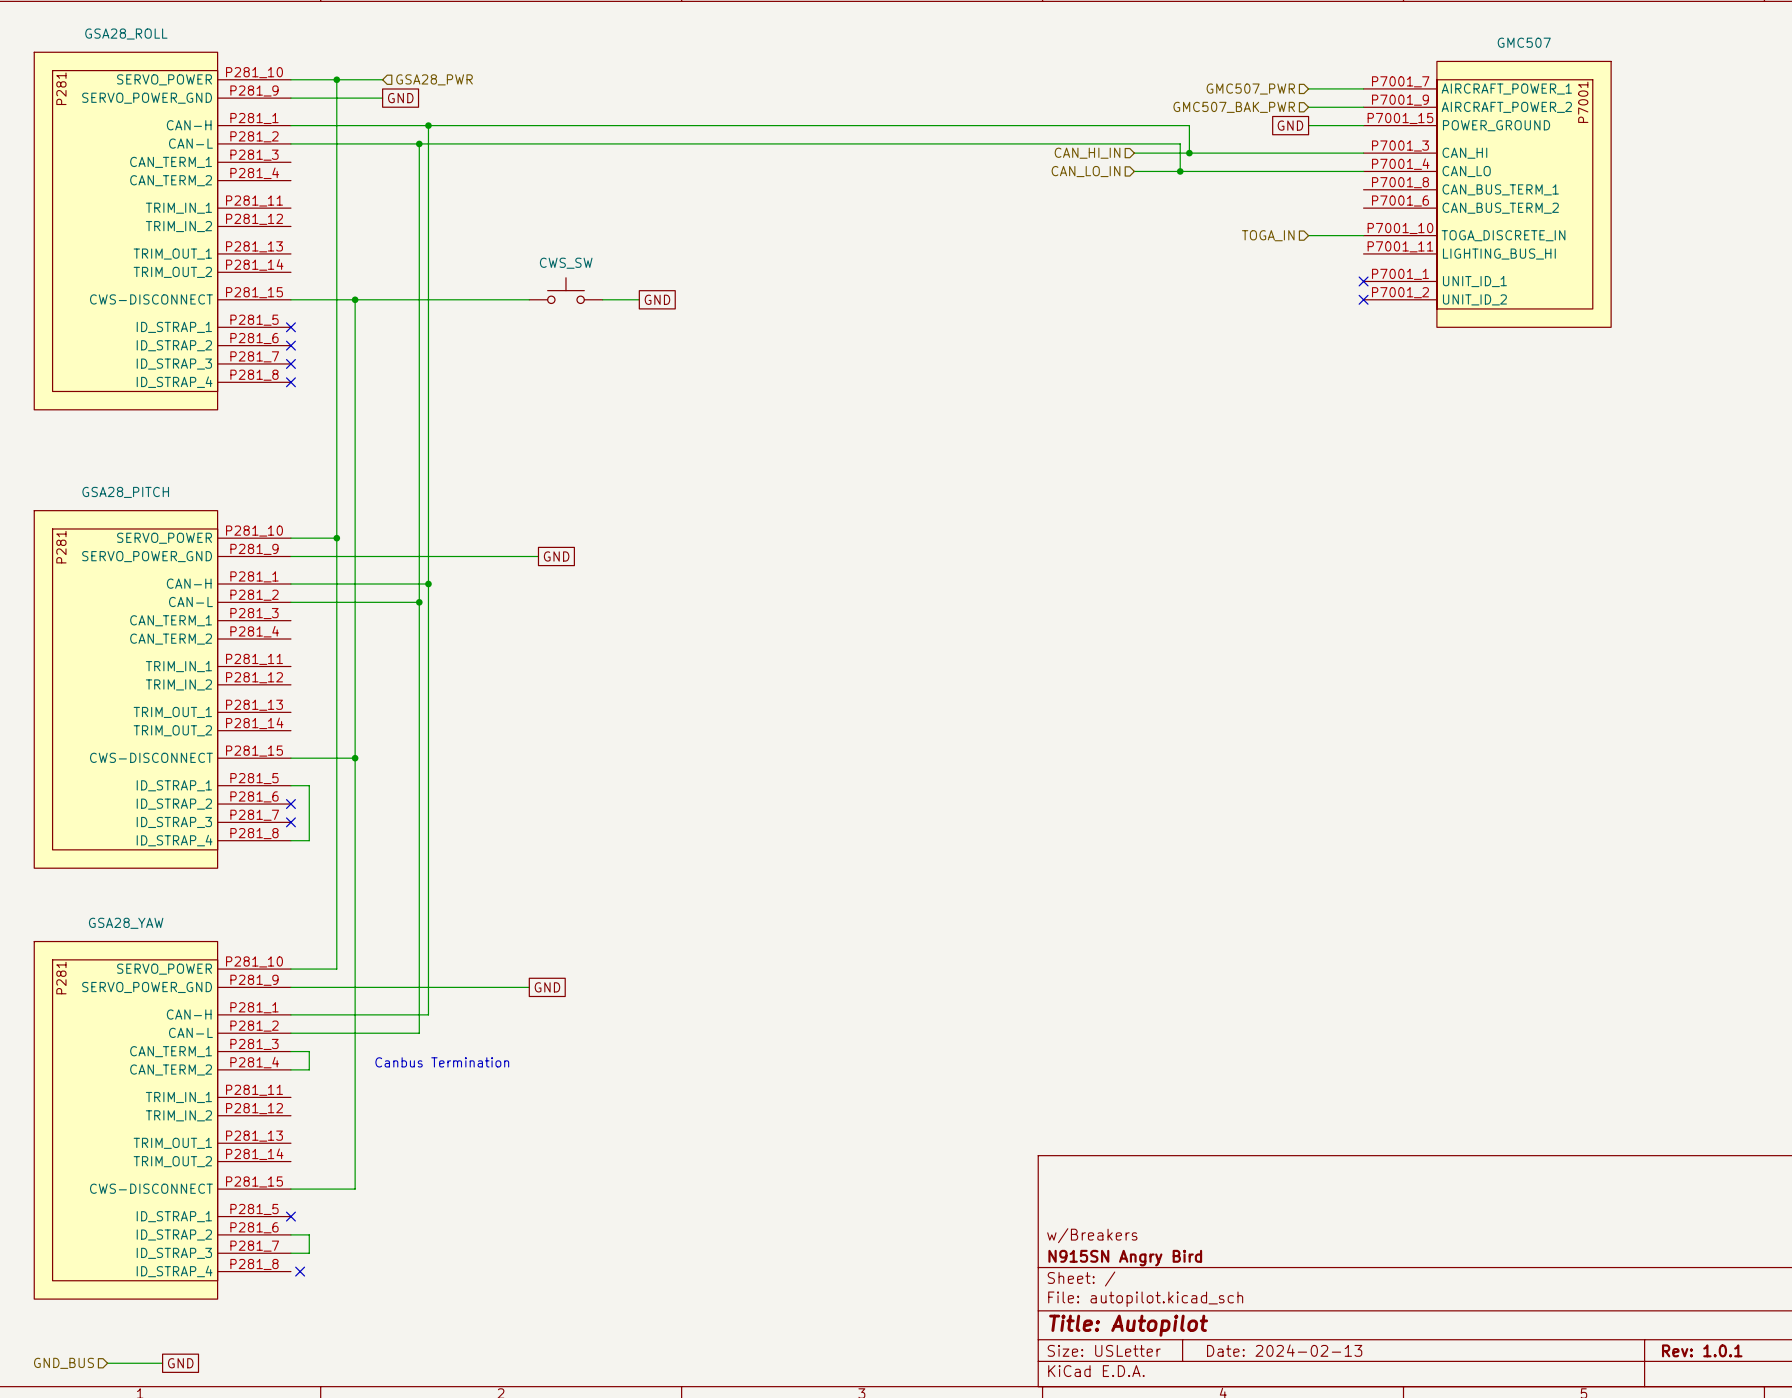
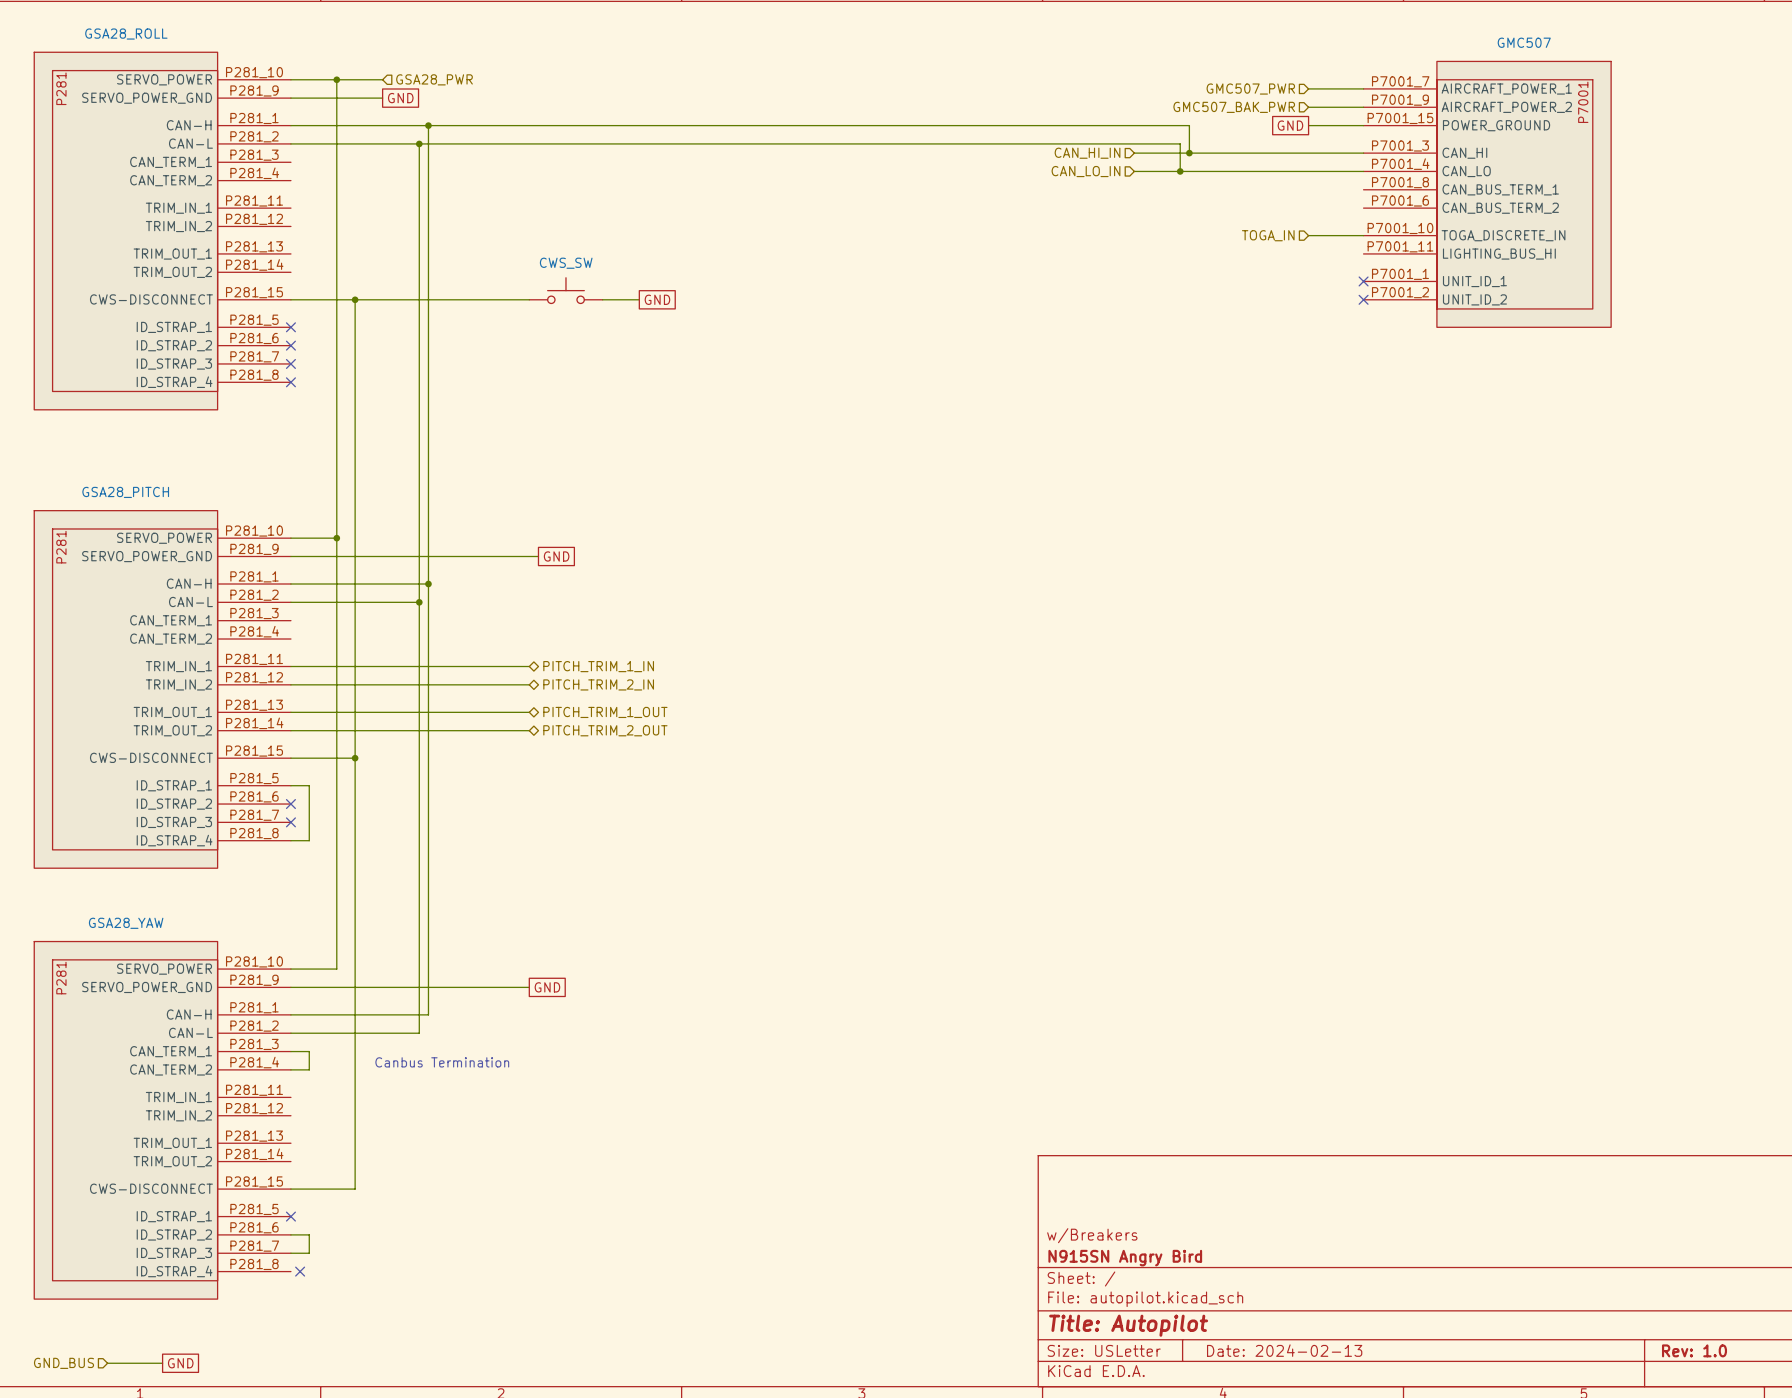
wire: none -> (290, 666) (529, 666)
hierarchical label: none -> PITCH_TRIM_1_IN (598, 666)
wire: none -> (290, 684) (529, 684)
hierarchical label: none -> PITCH_TRIM_2_IN (598, 684)
wire: none -> (290, 712) (529, 712)
hierarchical label: none -> PITCH_TRIM_1_OUT (605, 712)
wire: none -> (290, 730) (529, 730)
hierarchical label: none -> PITCH_TRIM_2_OUT (605, 730)
title block: Rev: 1.0.1 (1702, 1350) -> Rev: 1.0 (1694, 1350)

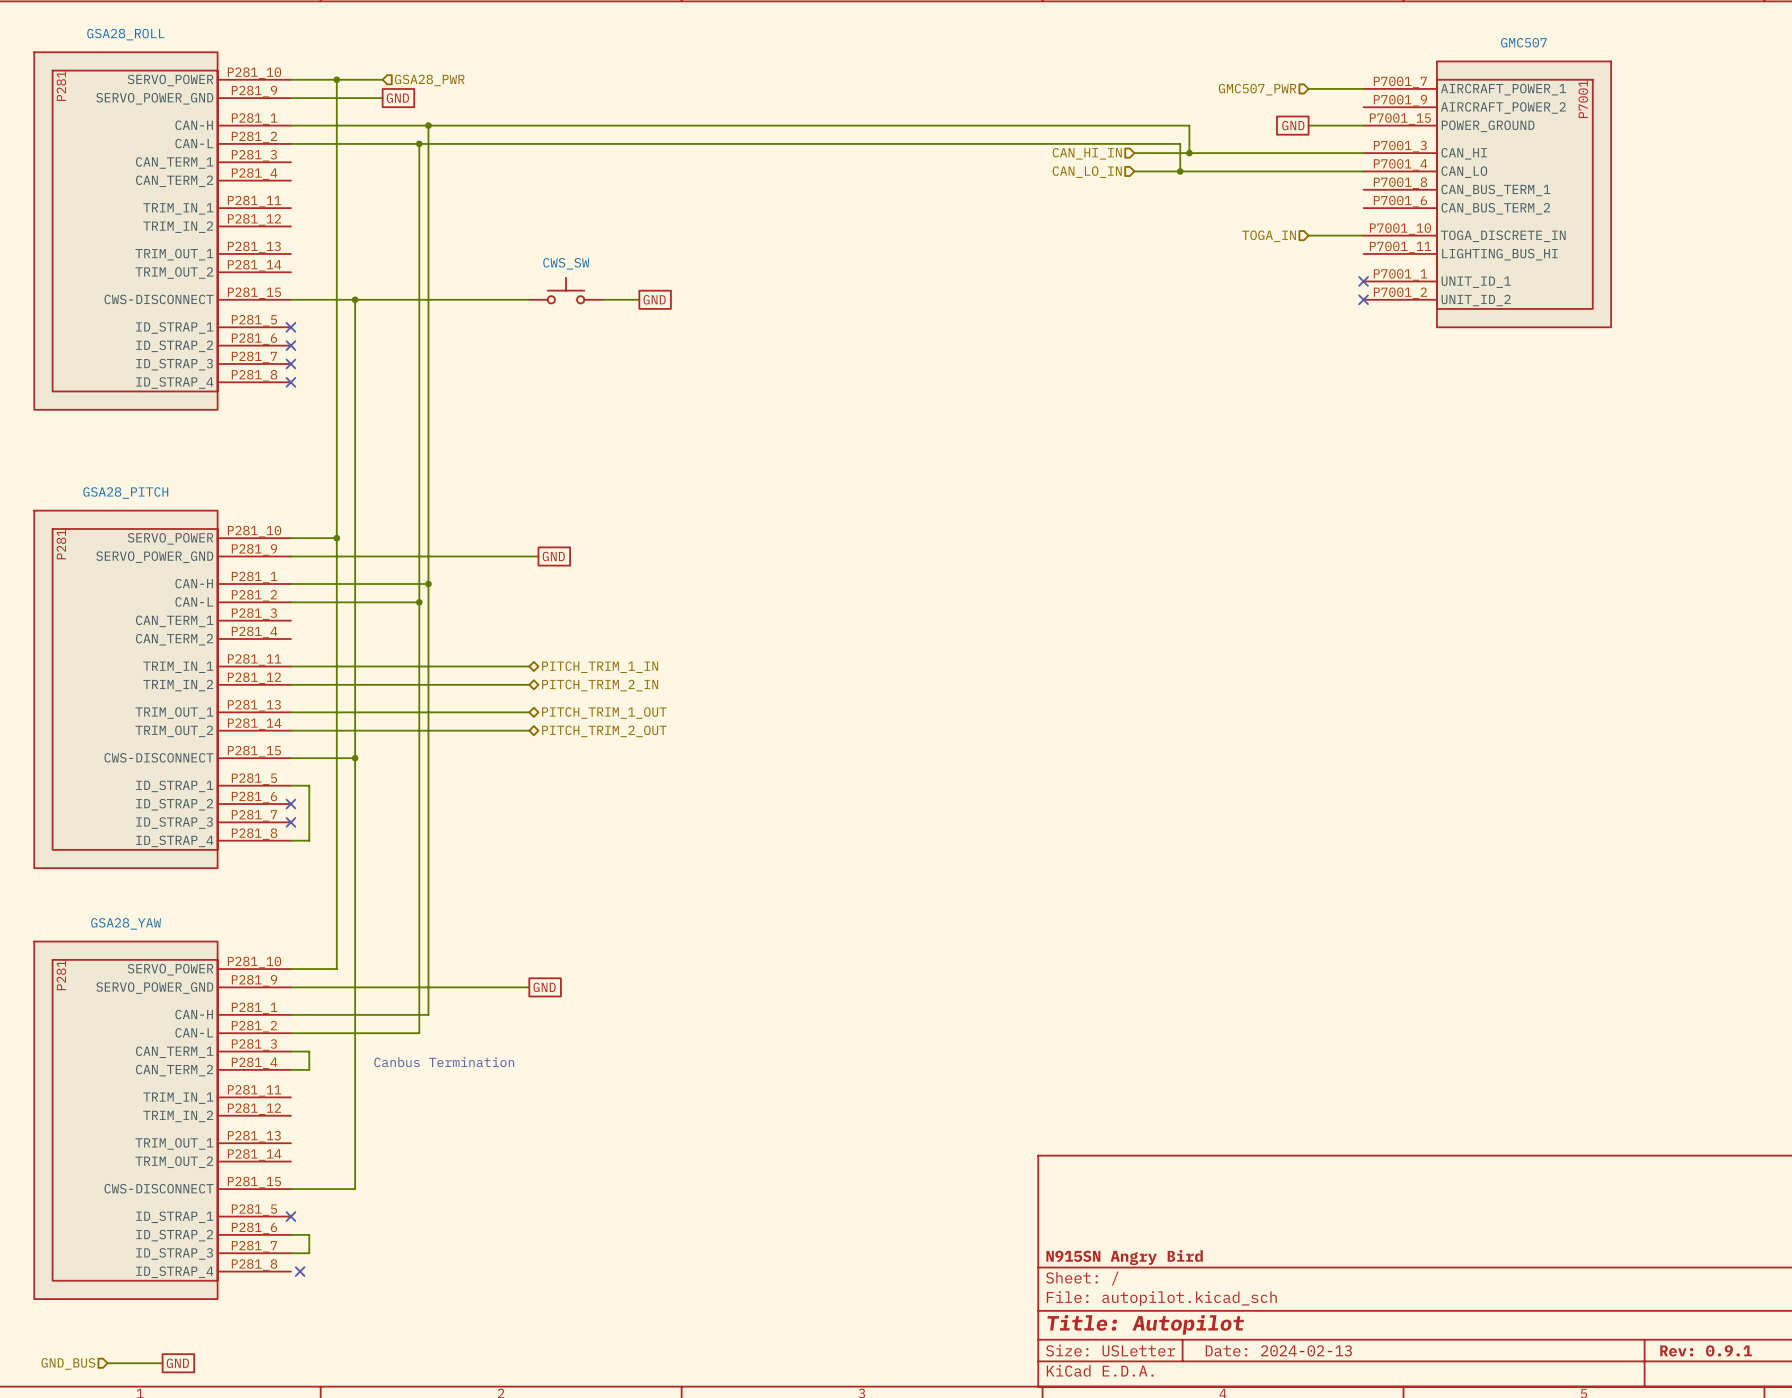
hierarchical label: GMC507_BAK_PWR (1234, 107) -> none
wire: (1308, 107) (1363, 107) -> none
title block: w/Breakers (1092, 1235) -> none
title block: Rev: 1.0 (1694, 1350) -> Rev: 0.9.1 (1706, 1350)

